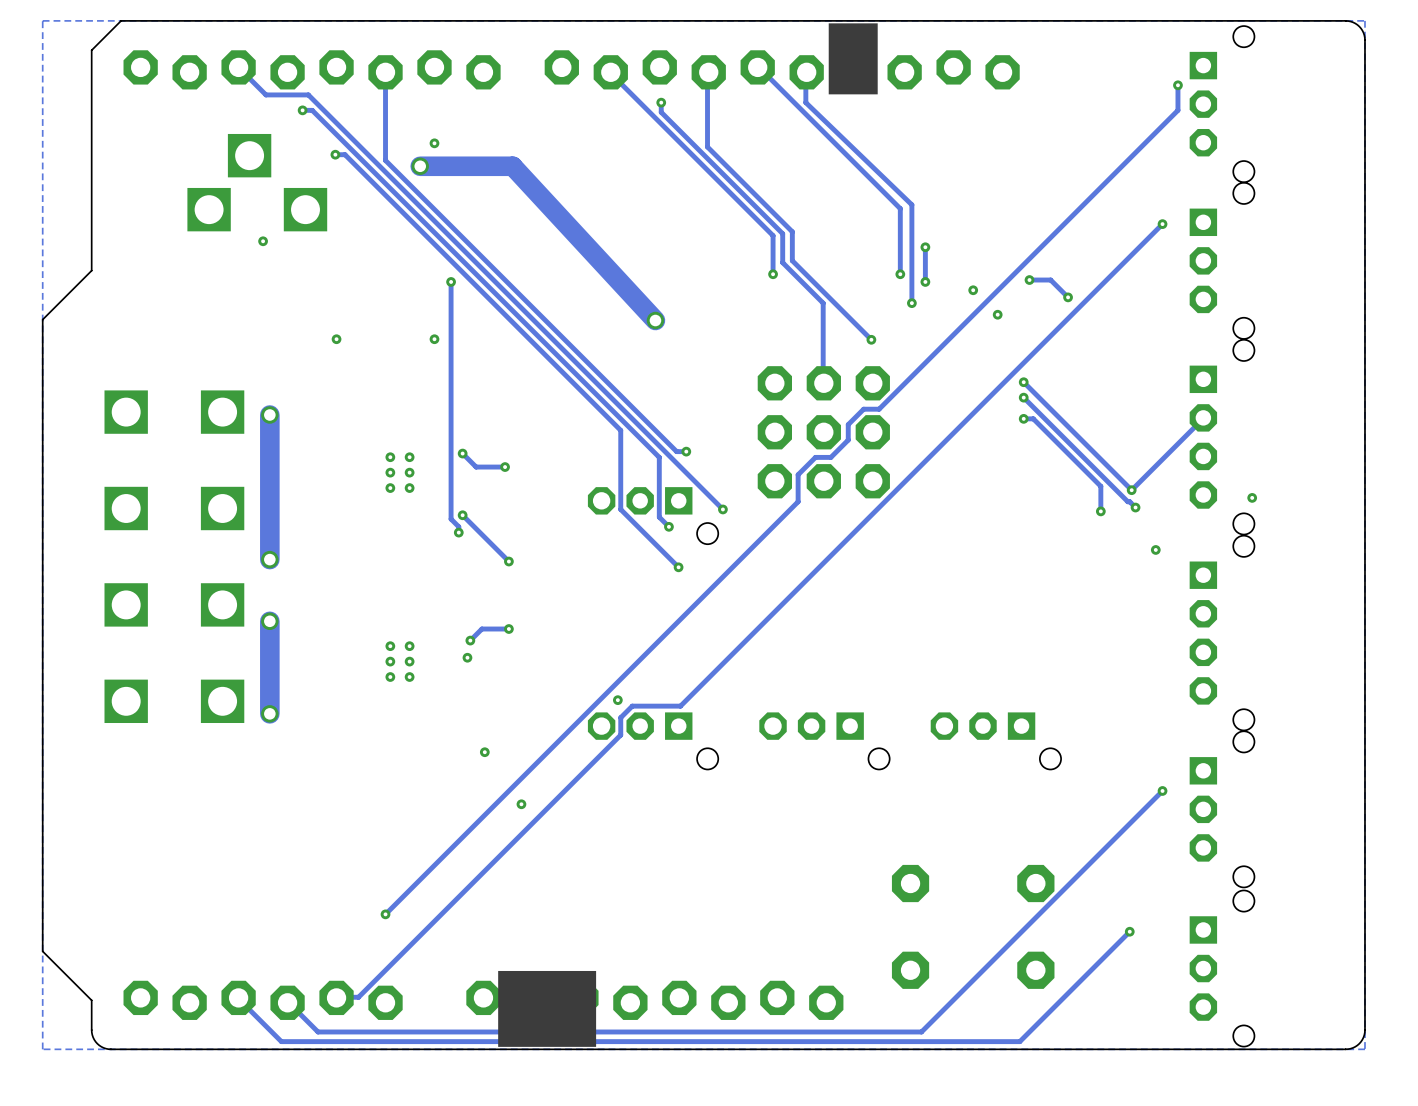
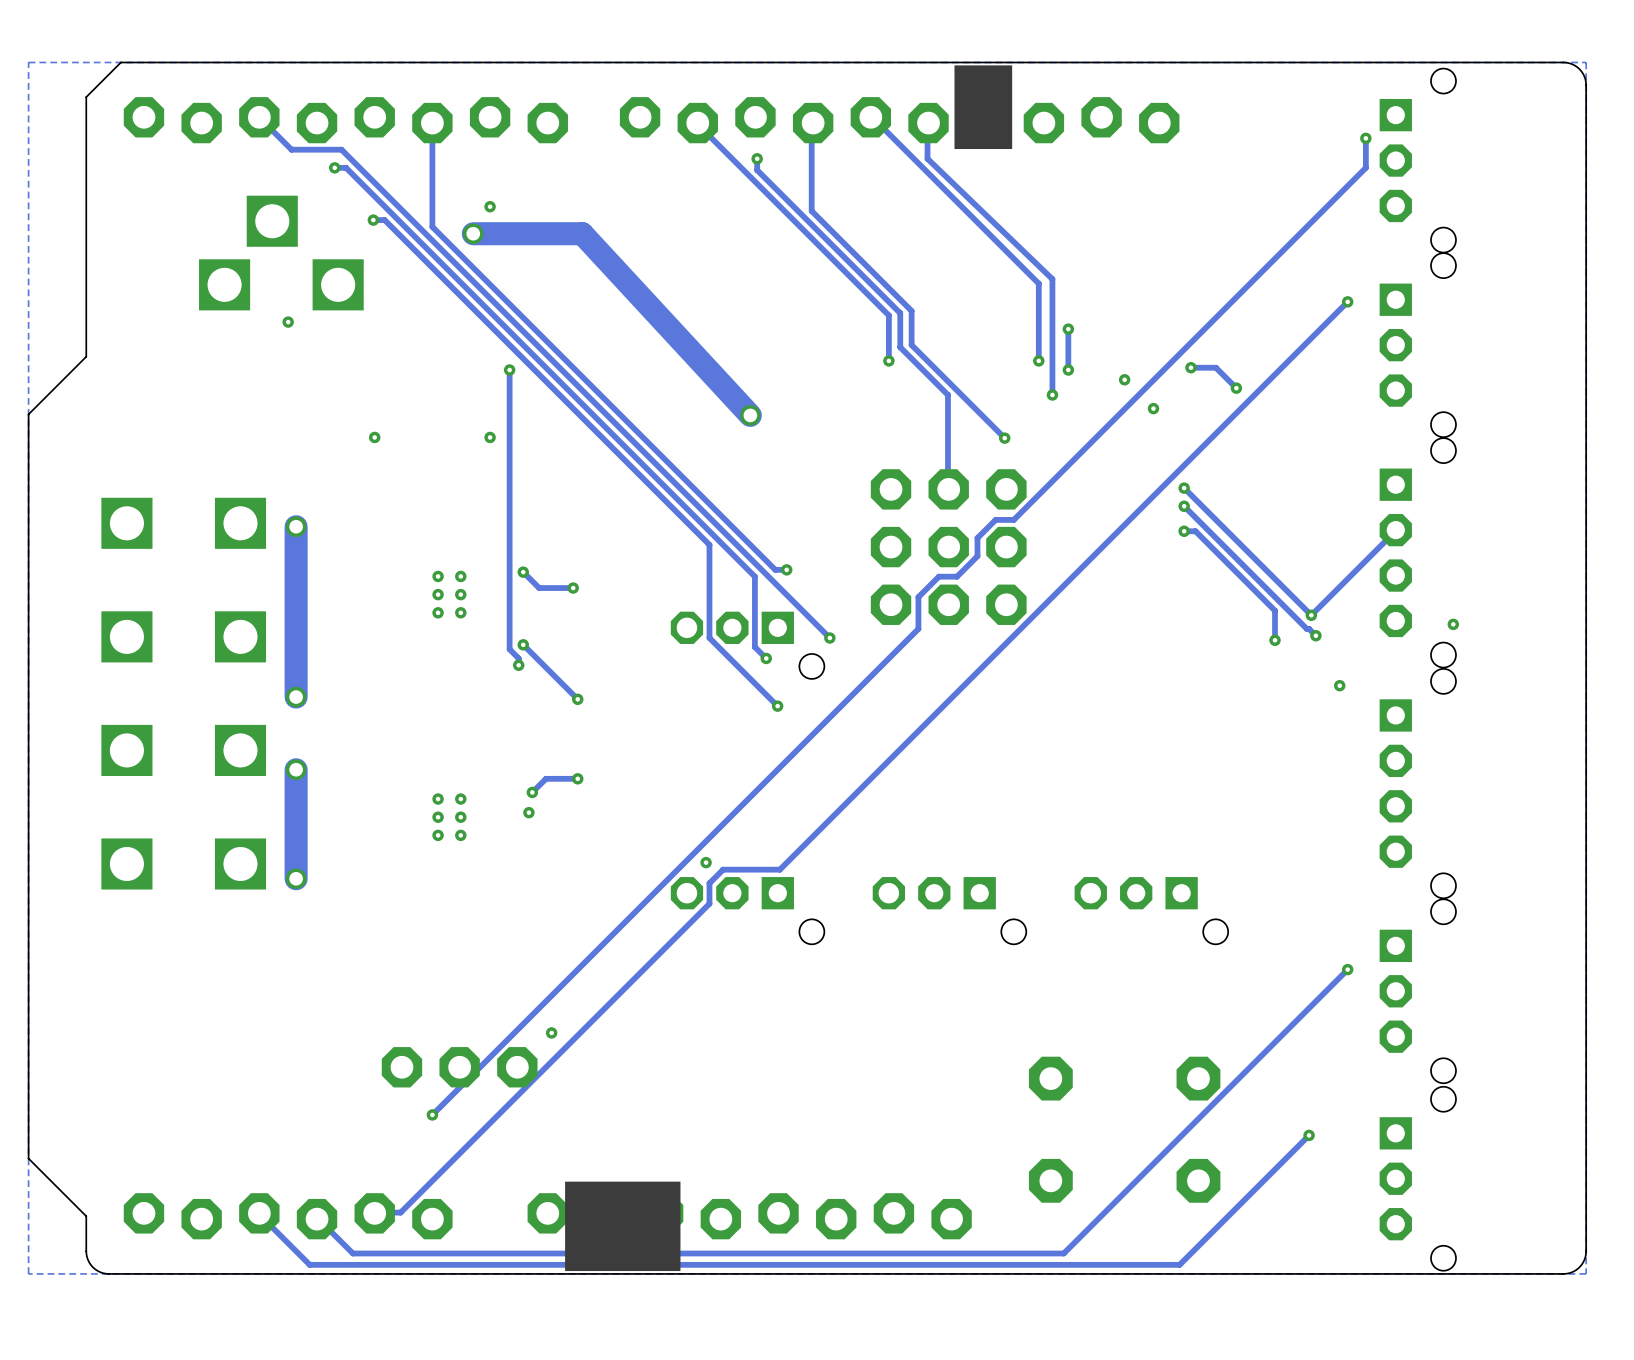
via: (484, 752) -> none
via: (521, 804) -> none
via: none -> (551, 1032)
part: none -> (459, 1067)

